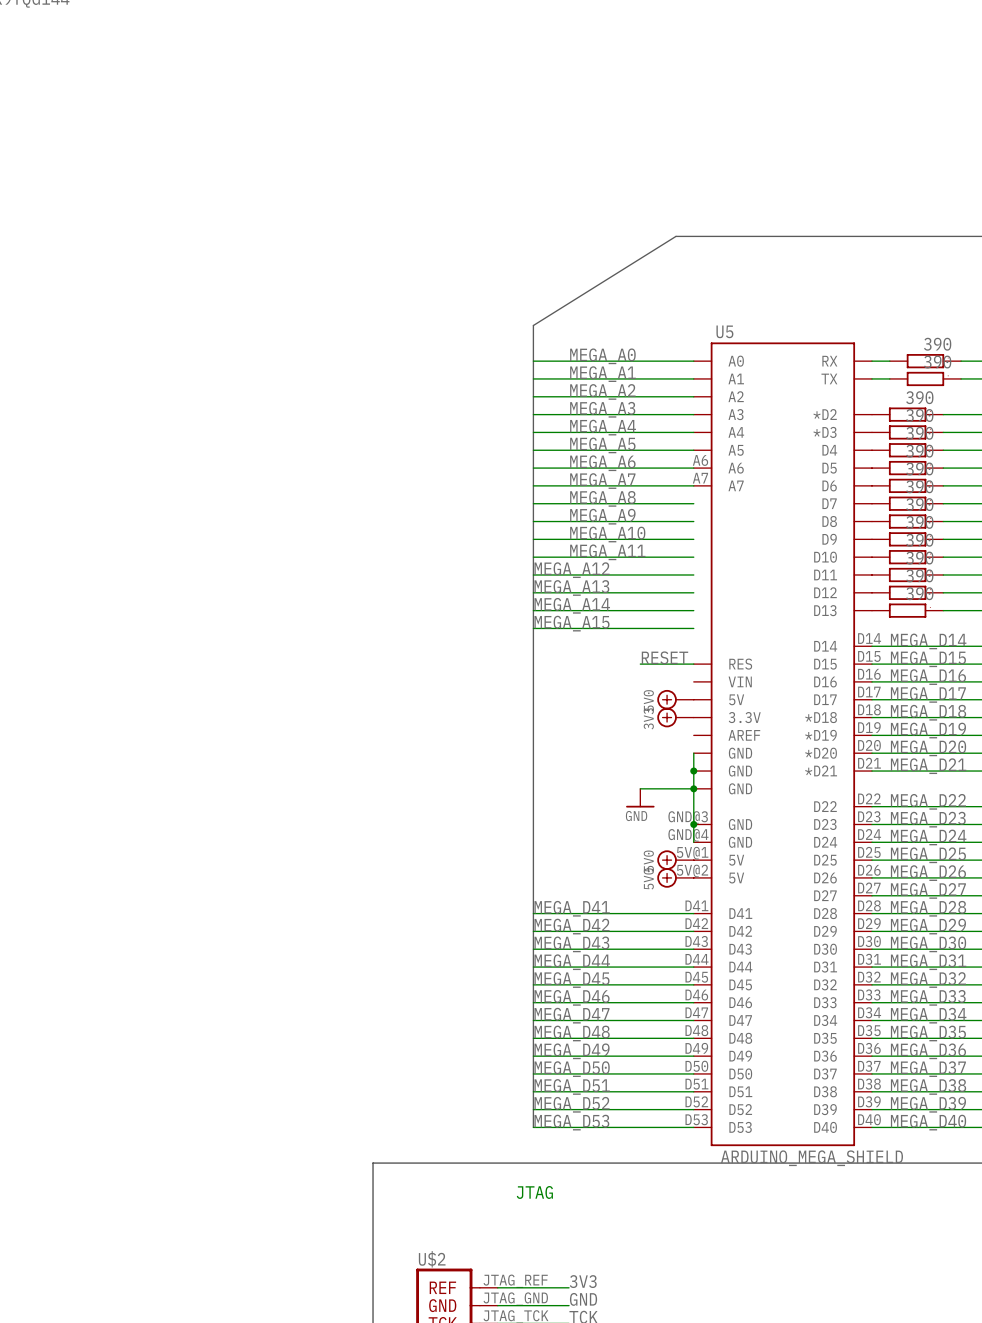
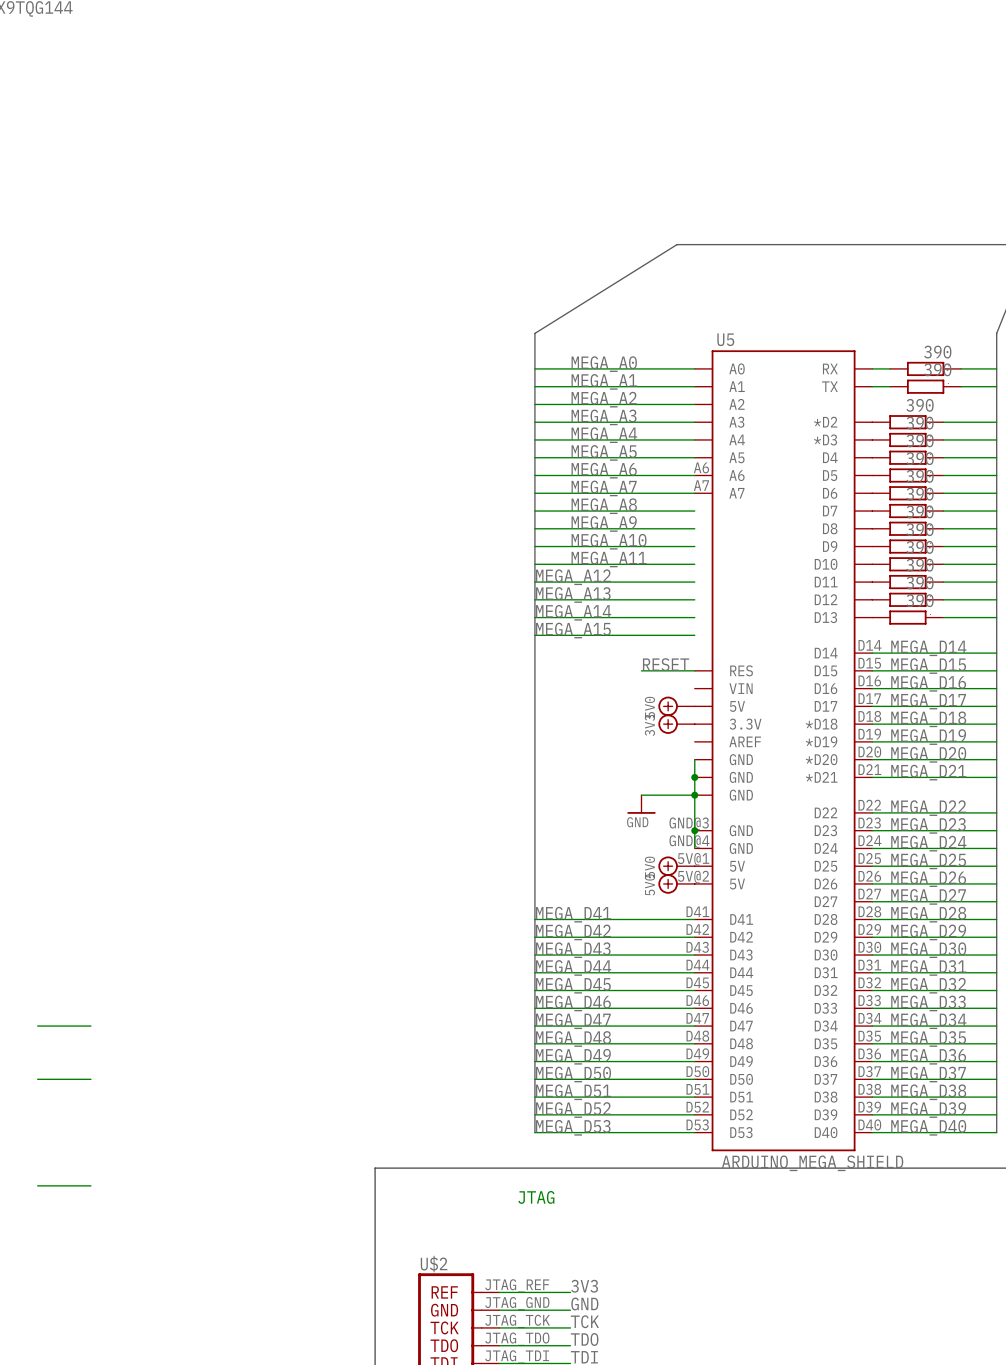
wire: none -> (37, 1026) (90, 1026)
wire: none -> (37, 1079) (90, 1079)
wire: none -> (37, 1185) (90, 1185)

